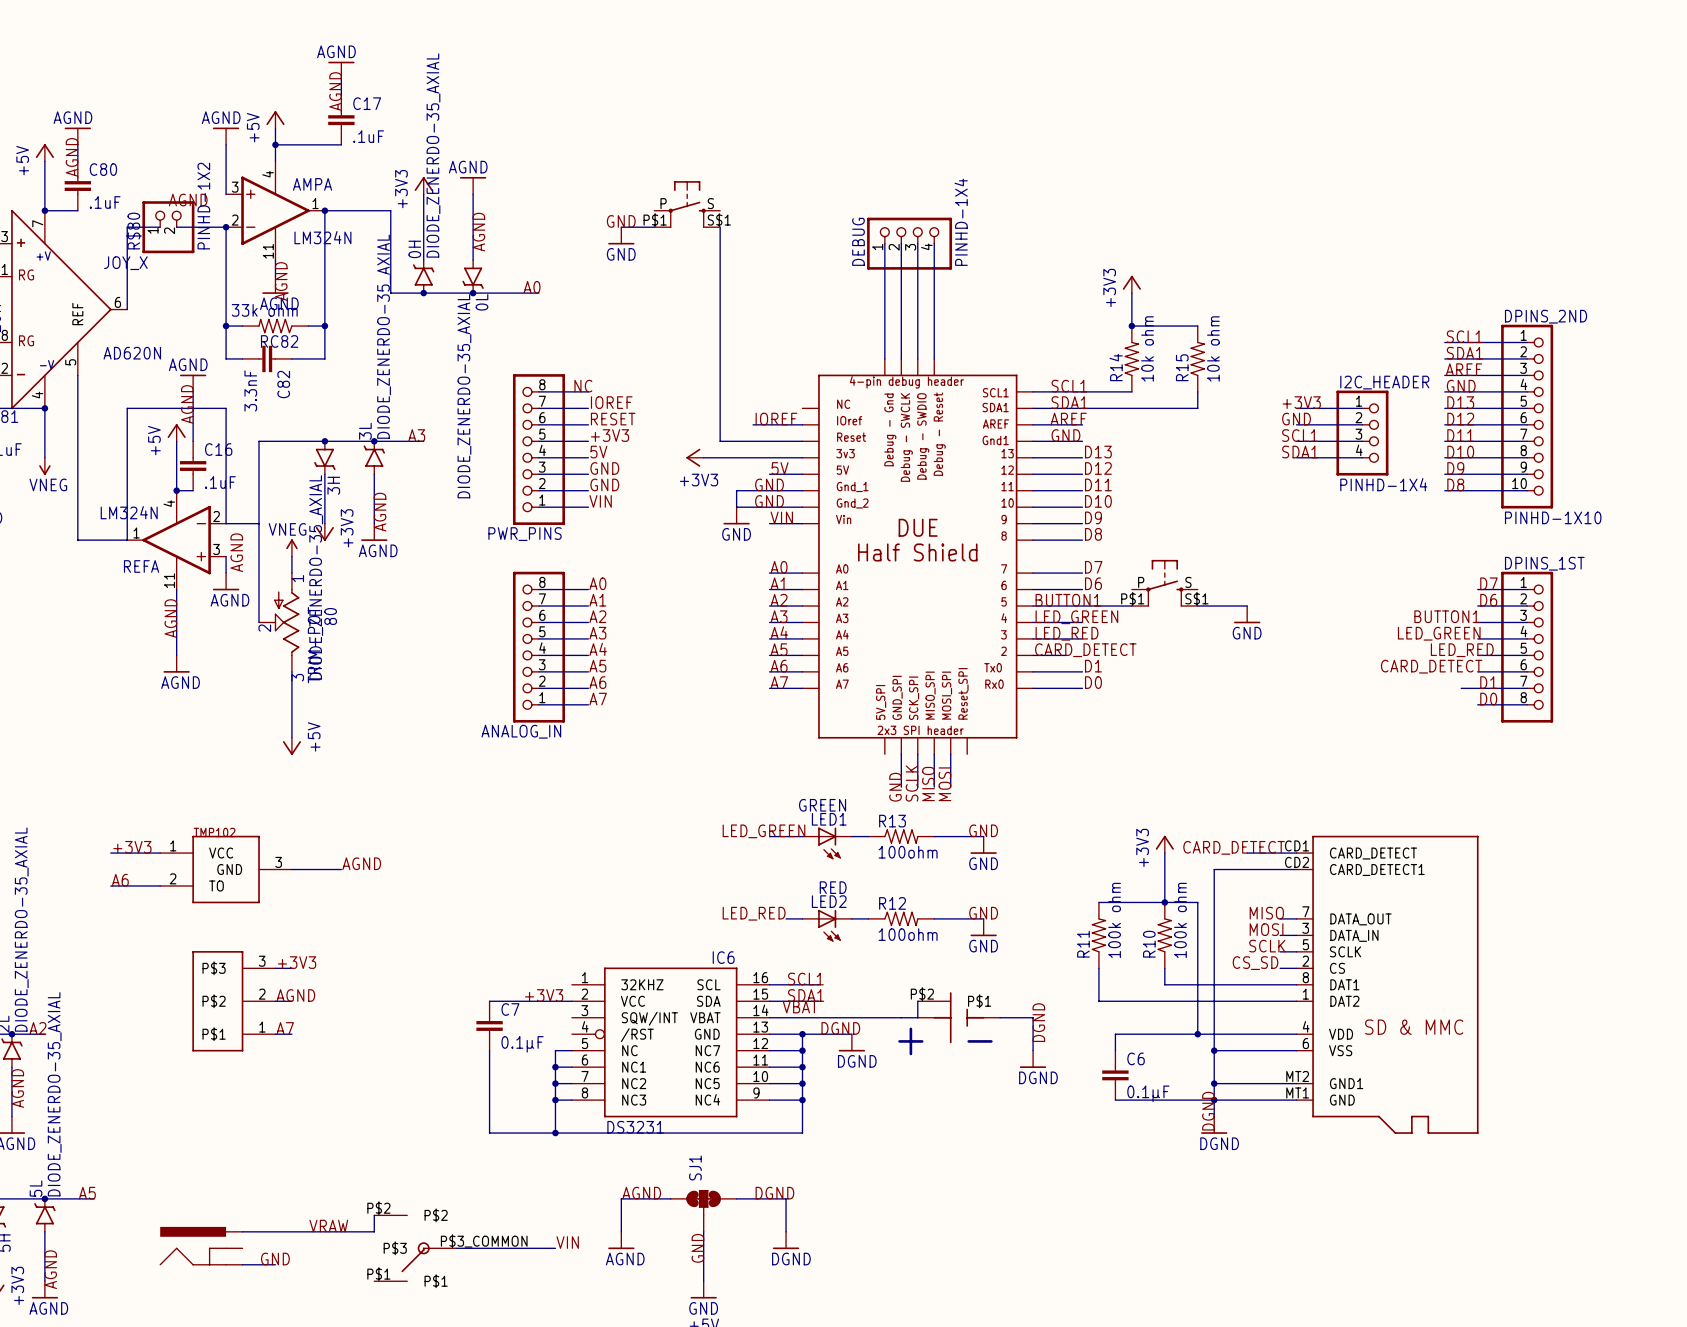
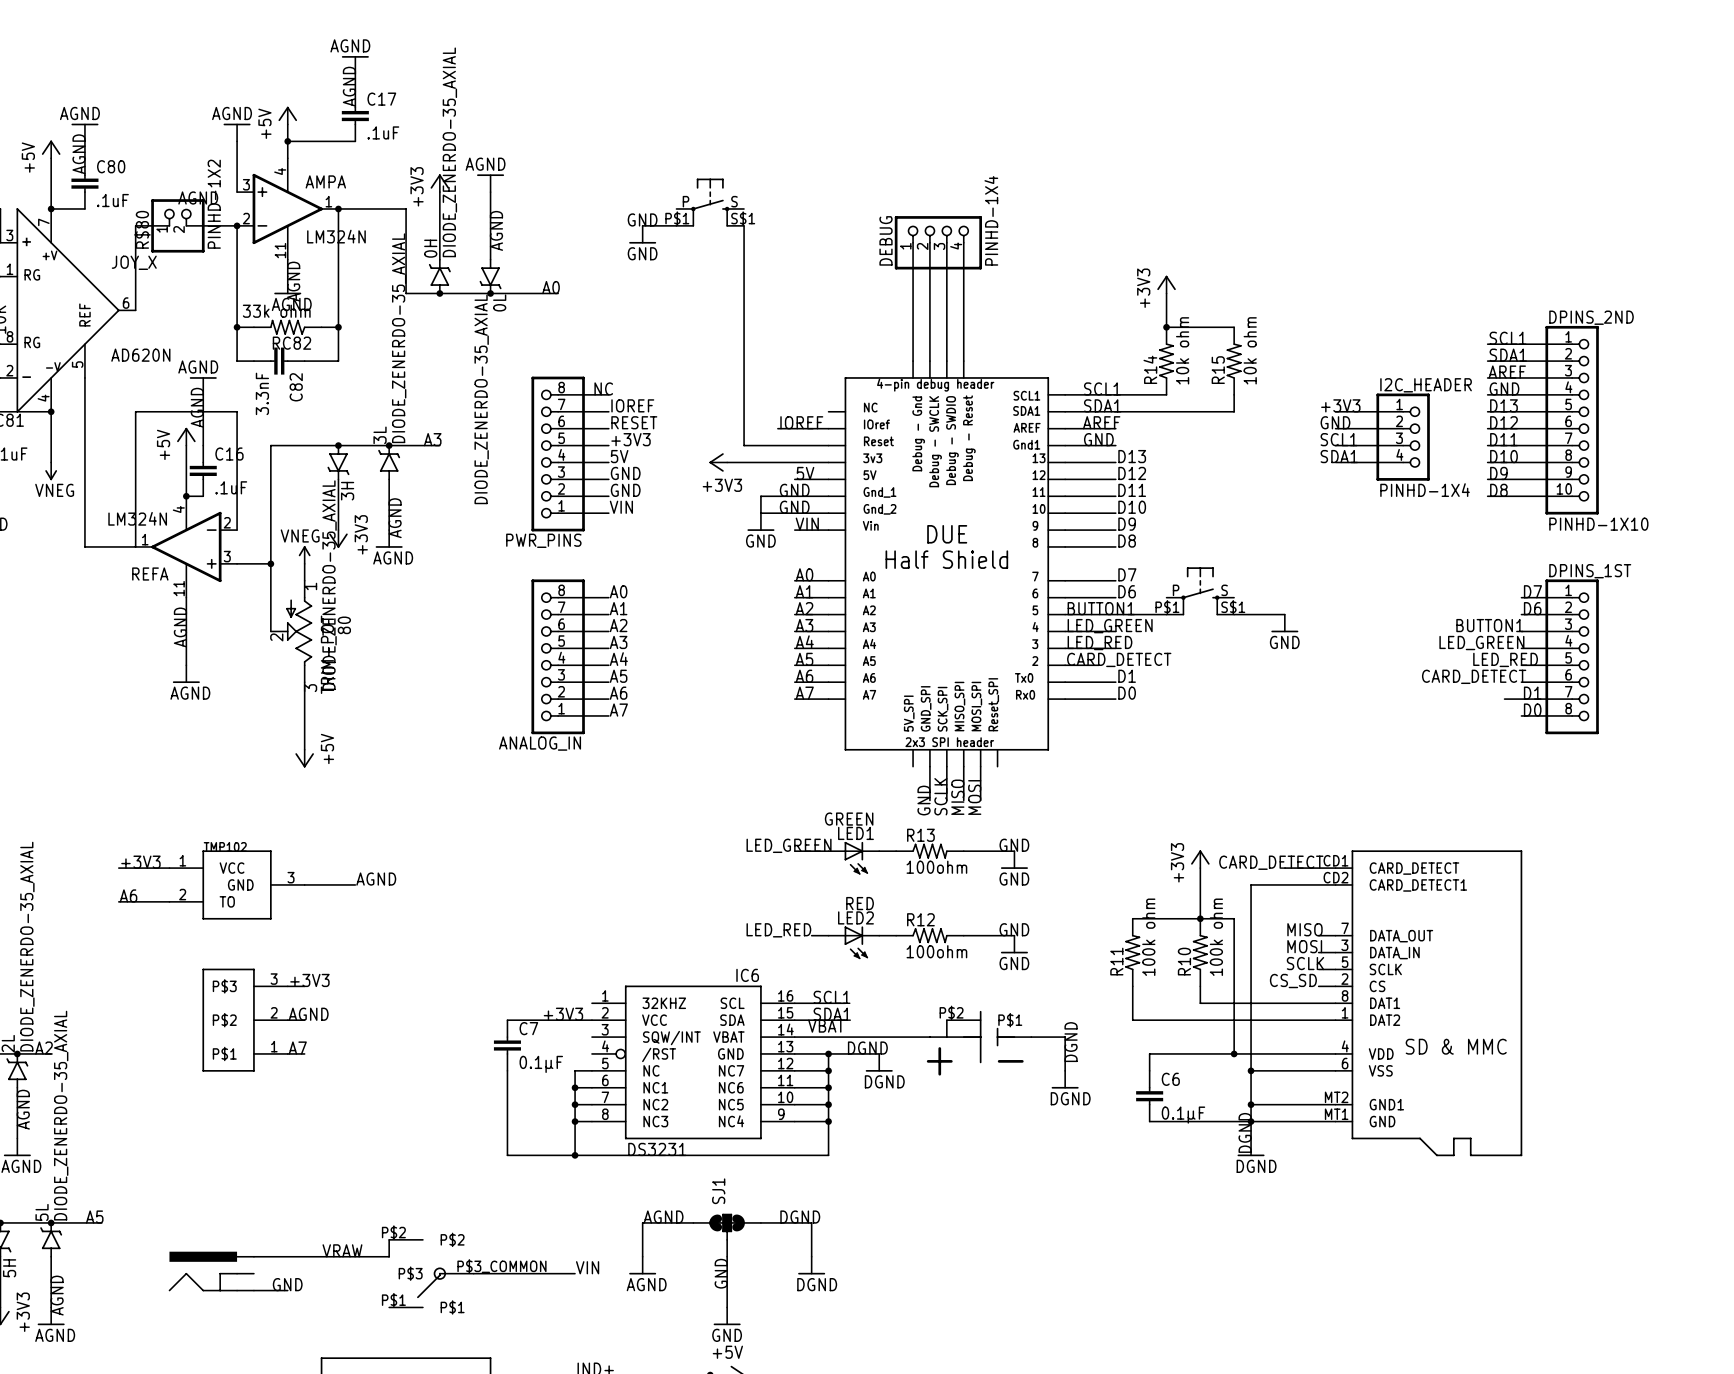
wire: (226, 523) (259, 523) -> none
label: AGND (236, 552) -> none
wire: (226, 556) (226, 573) -> (237, 563) (270, 563)
junction: none -> (270, 563)
power symbol: AGND (226, 581) -> none

